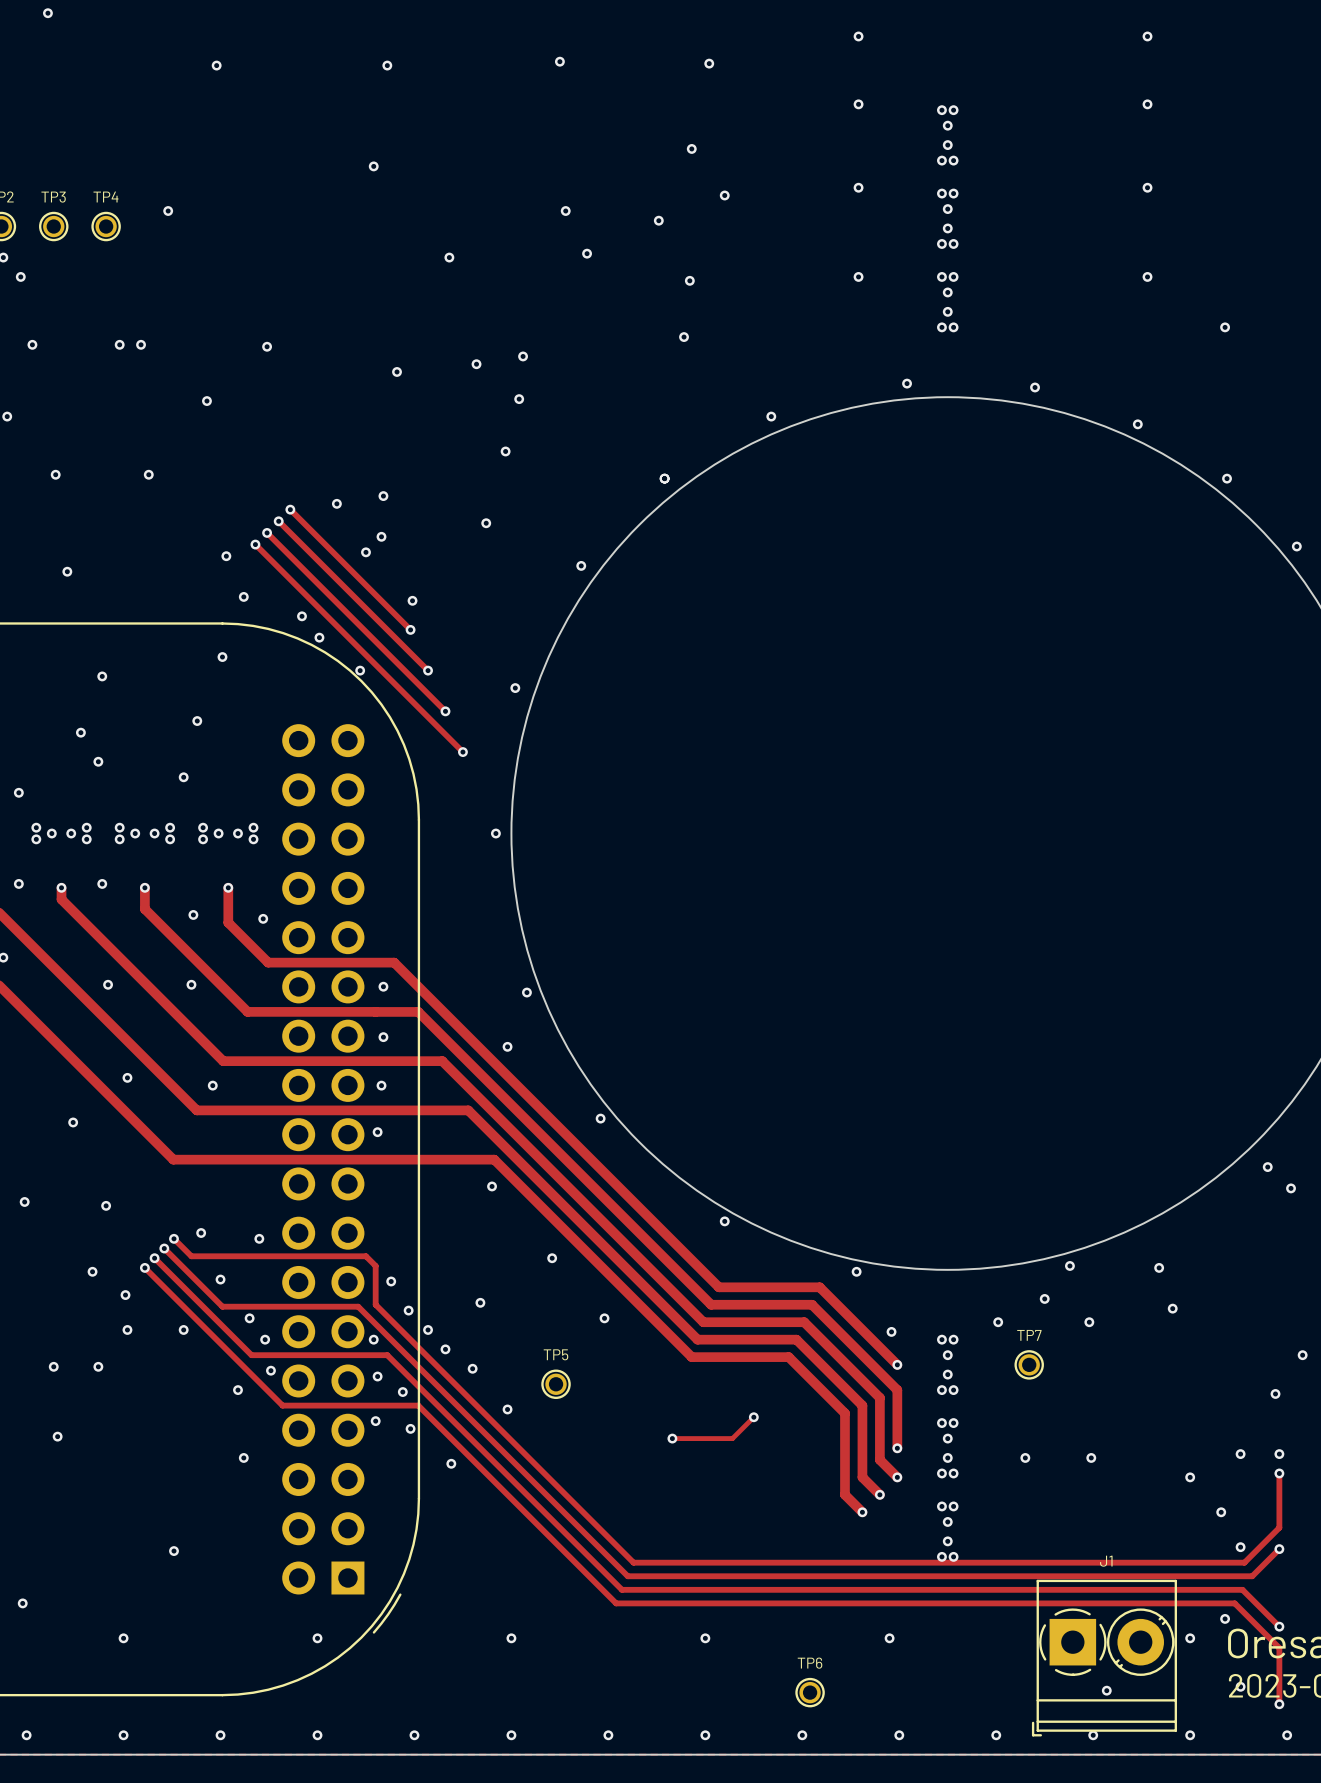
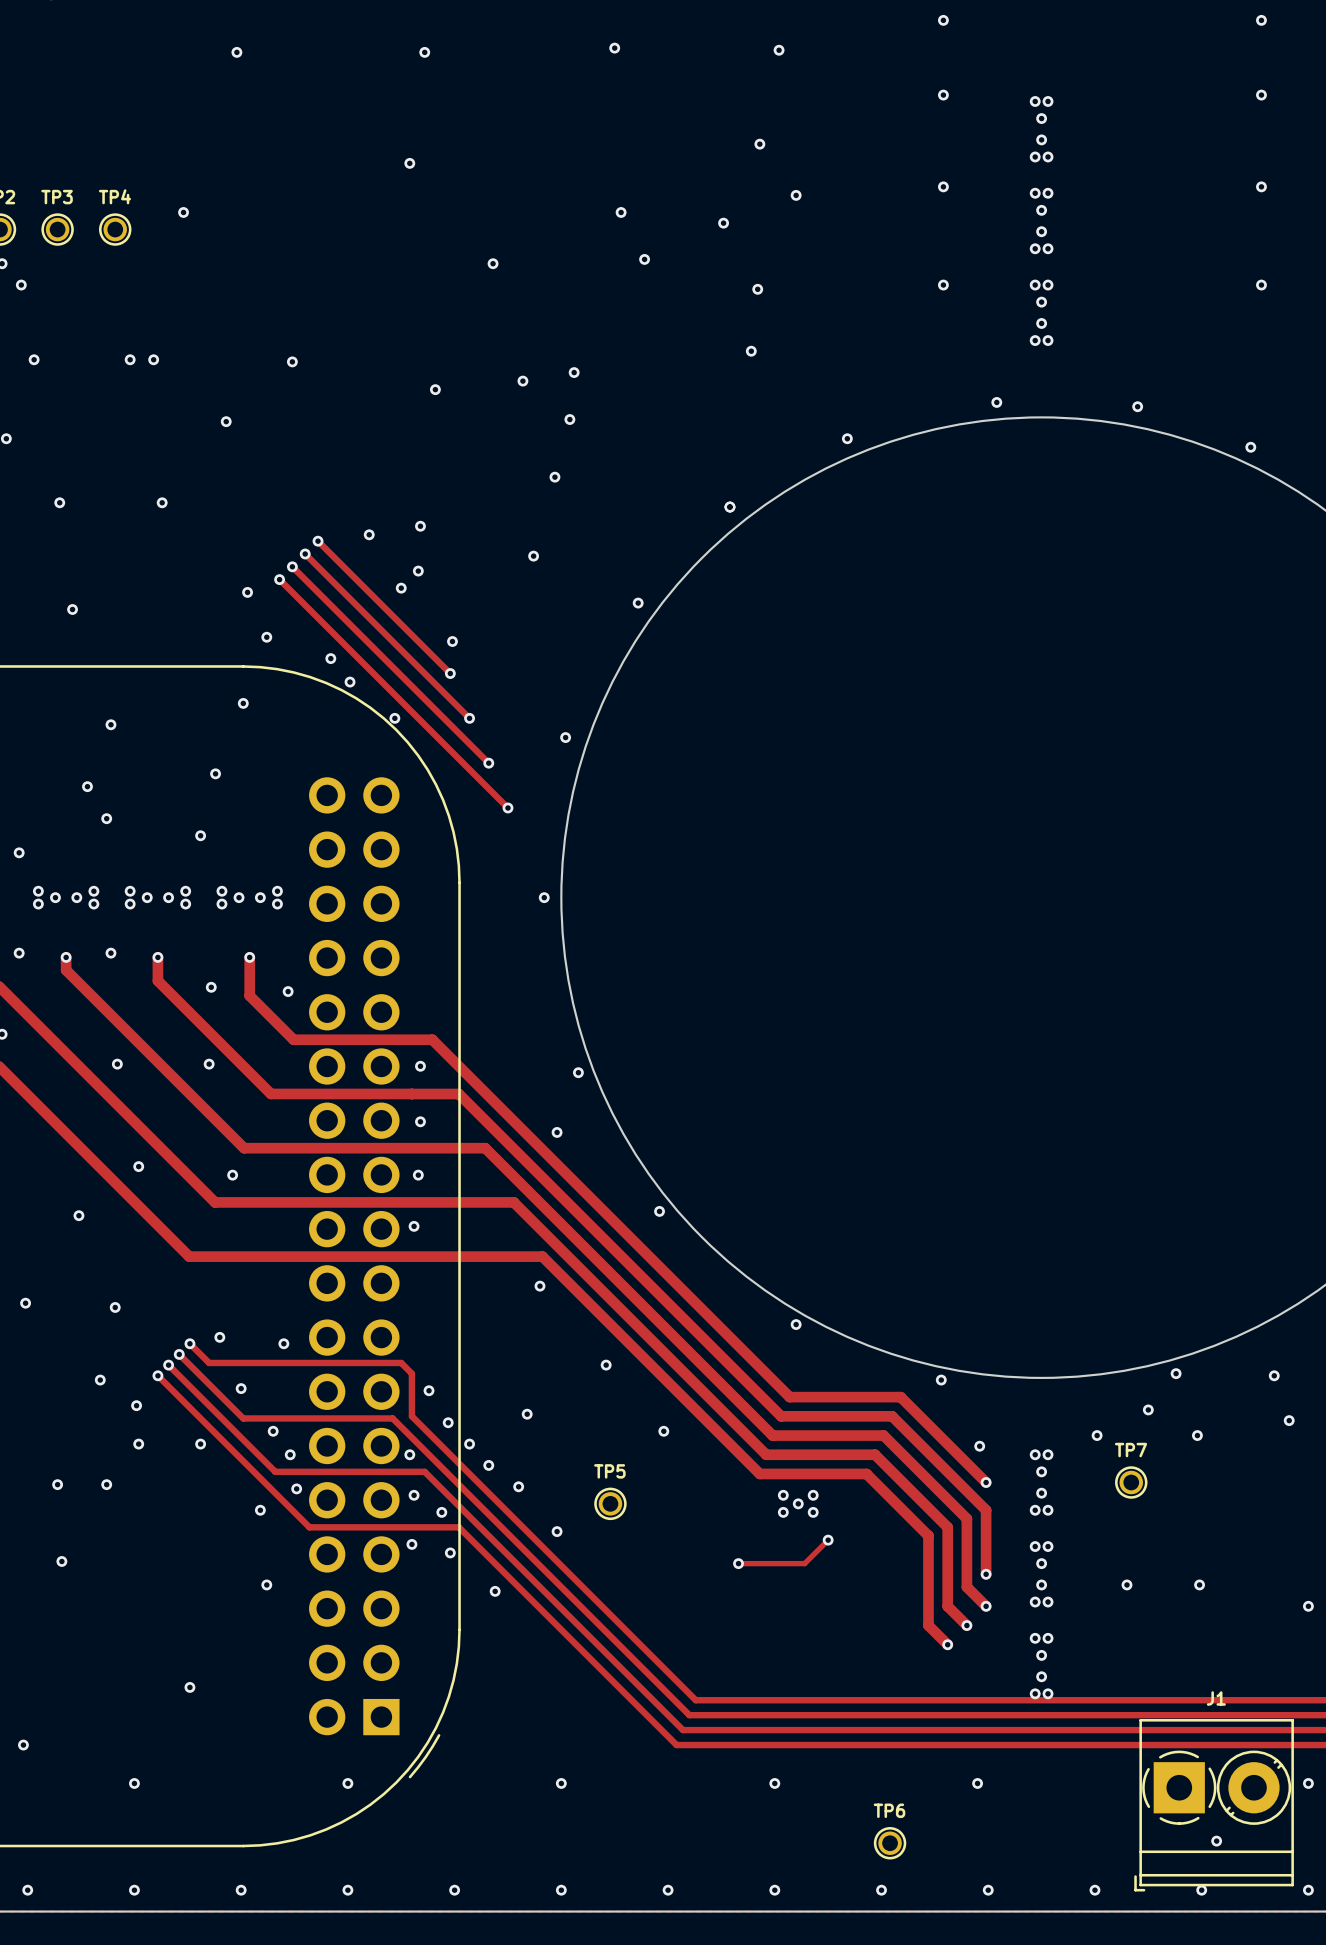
via: none -> (783, 1495)
via: none -> (813, 1495)
via: none -> (798, 1503)
via: none -> (783, 1512)
via: none -> (813, 1512)

